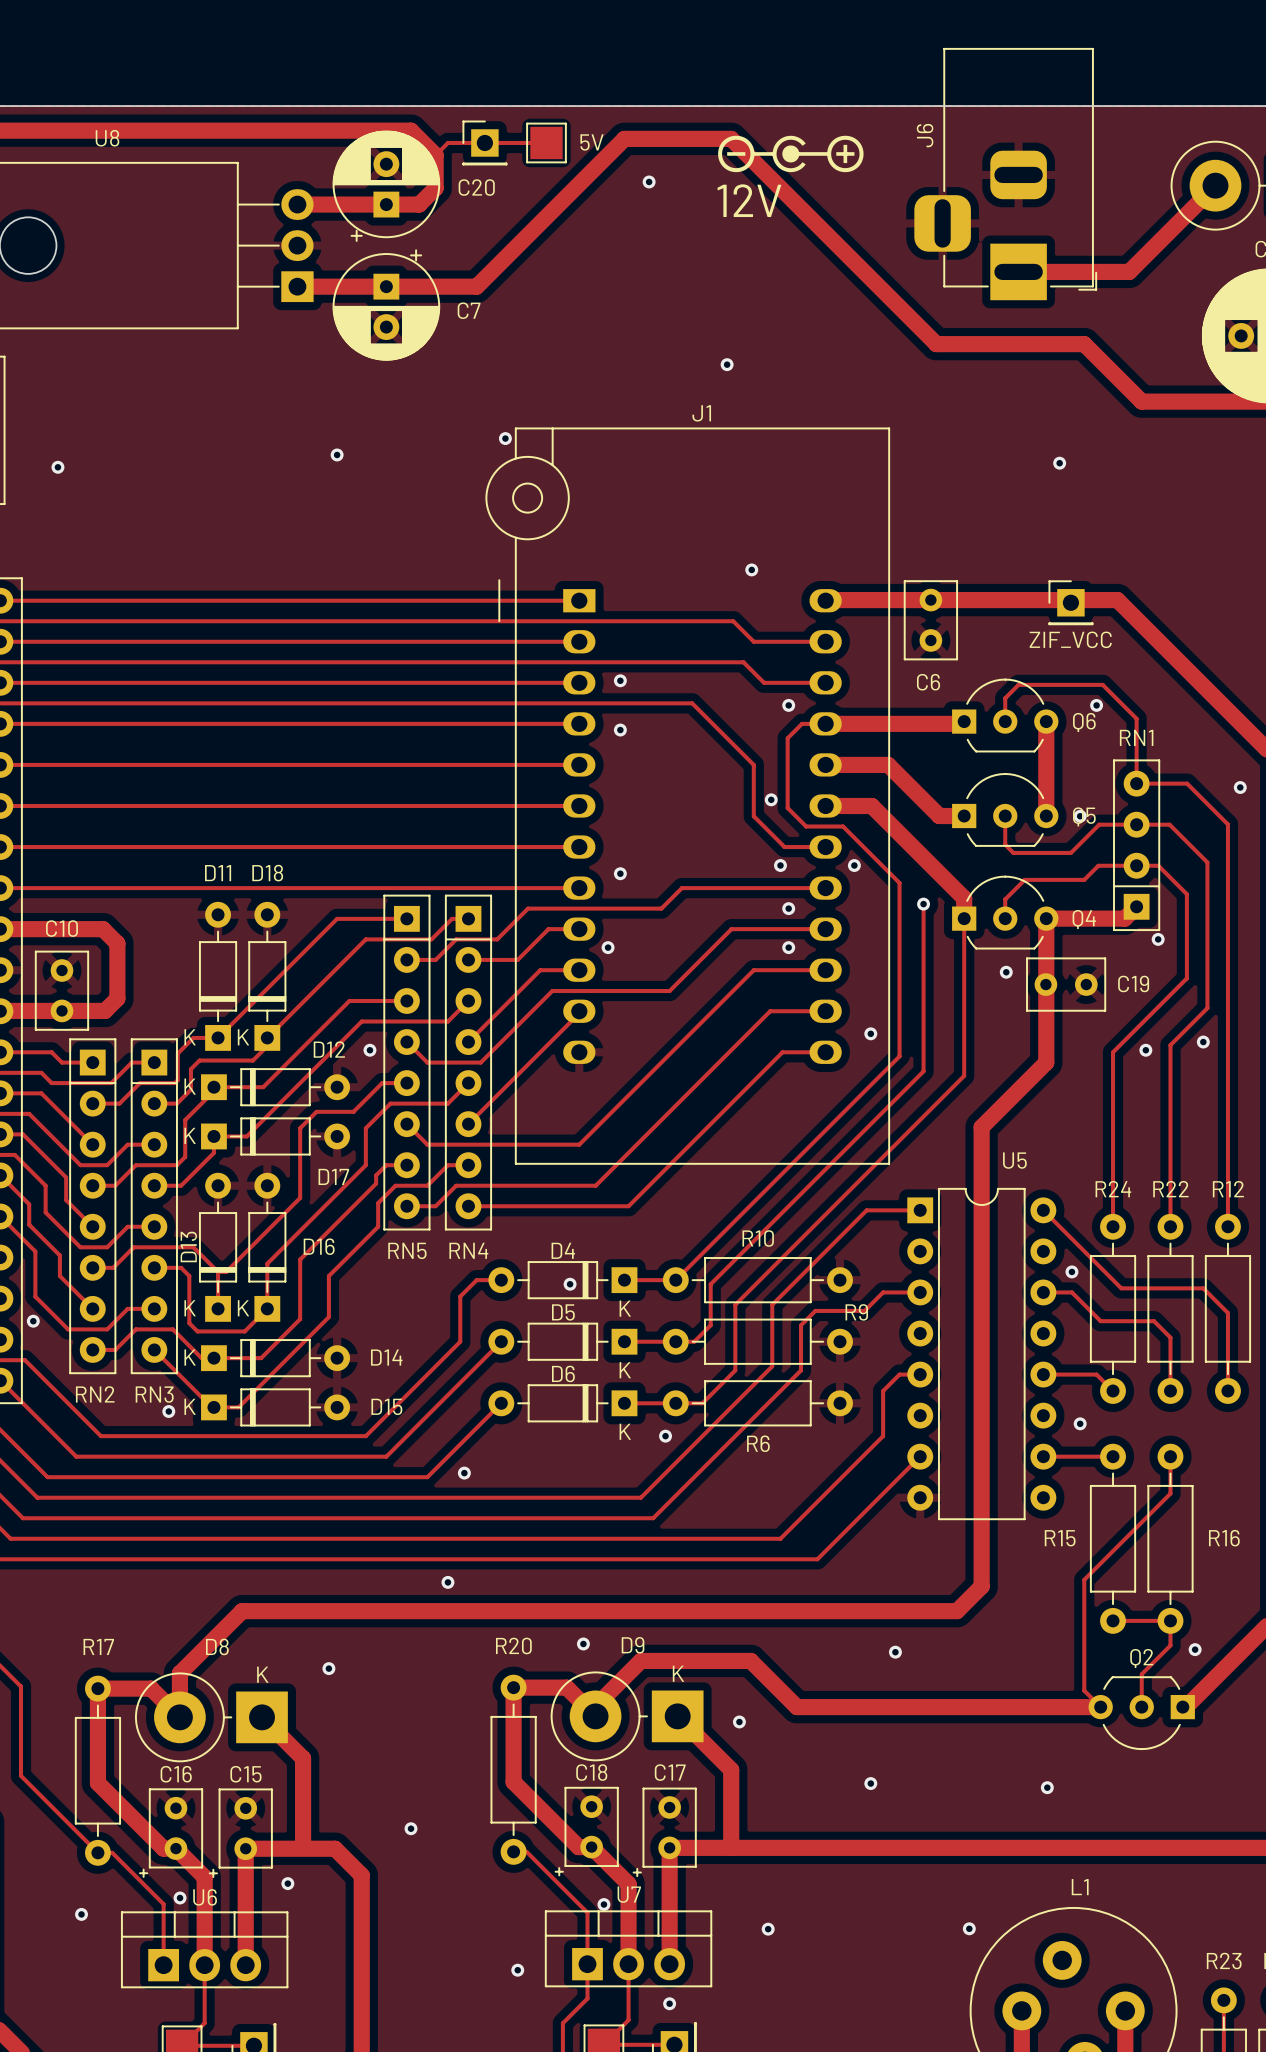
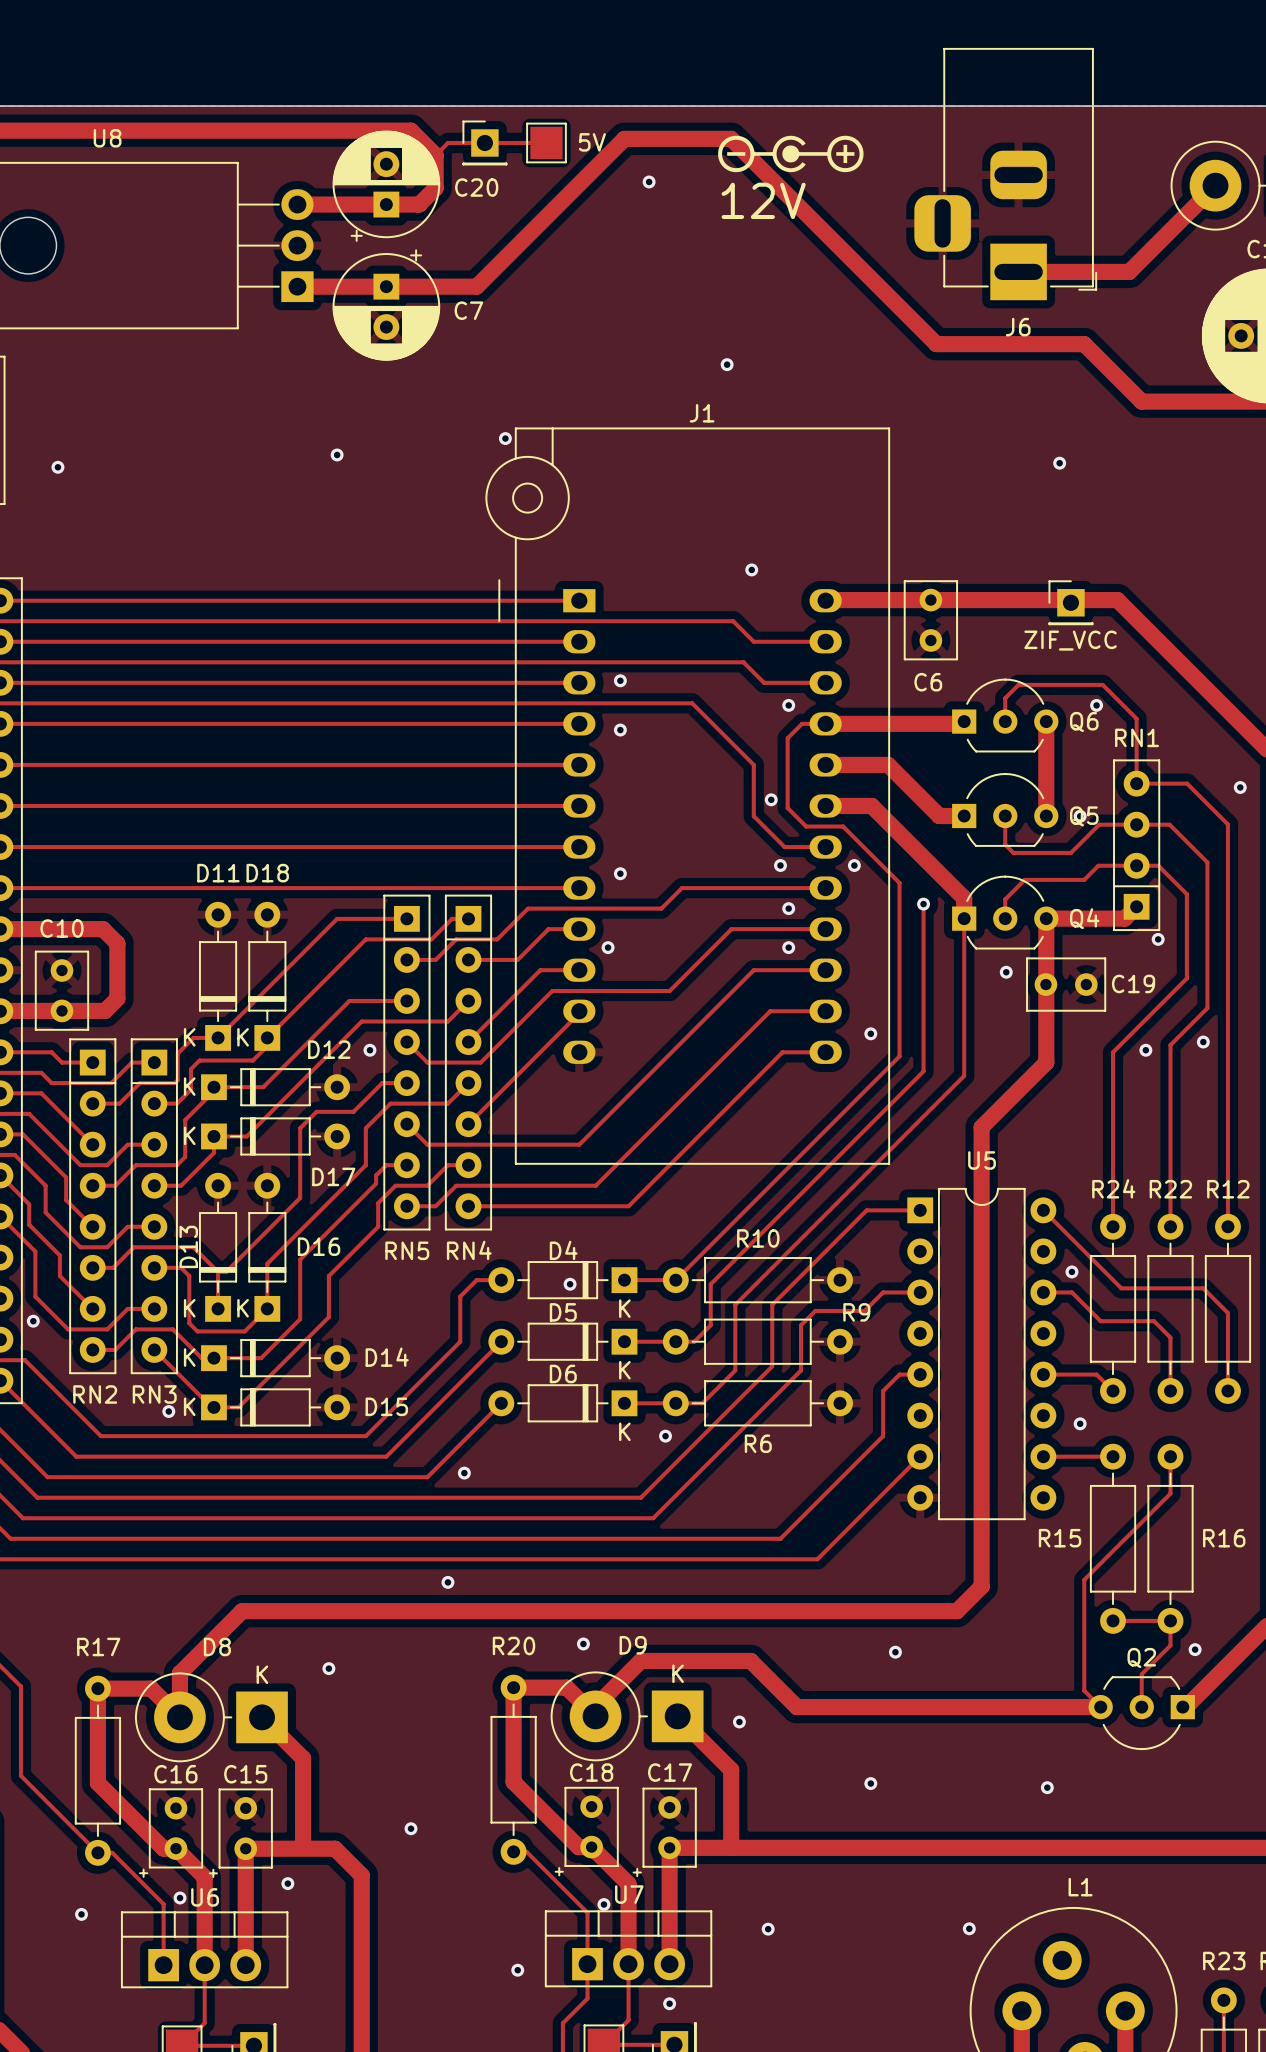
J6 name rotation: 0° (925, 135) -> 90° clockwise (1018, 327)
J6 name position: J6 (925, 135) -> J6 (1018, 327)
U5 name position: U5 (1014, 1160) -> U5 (982, 1160)

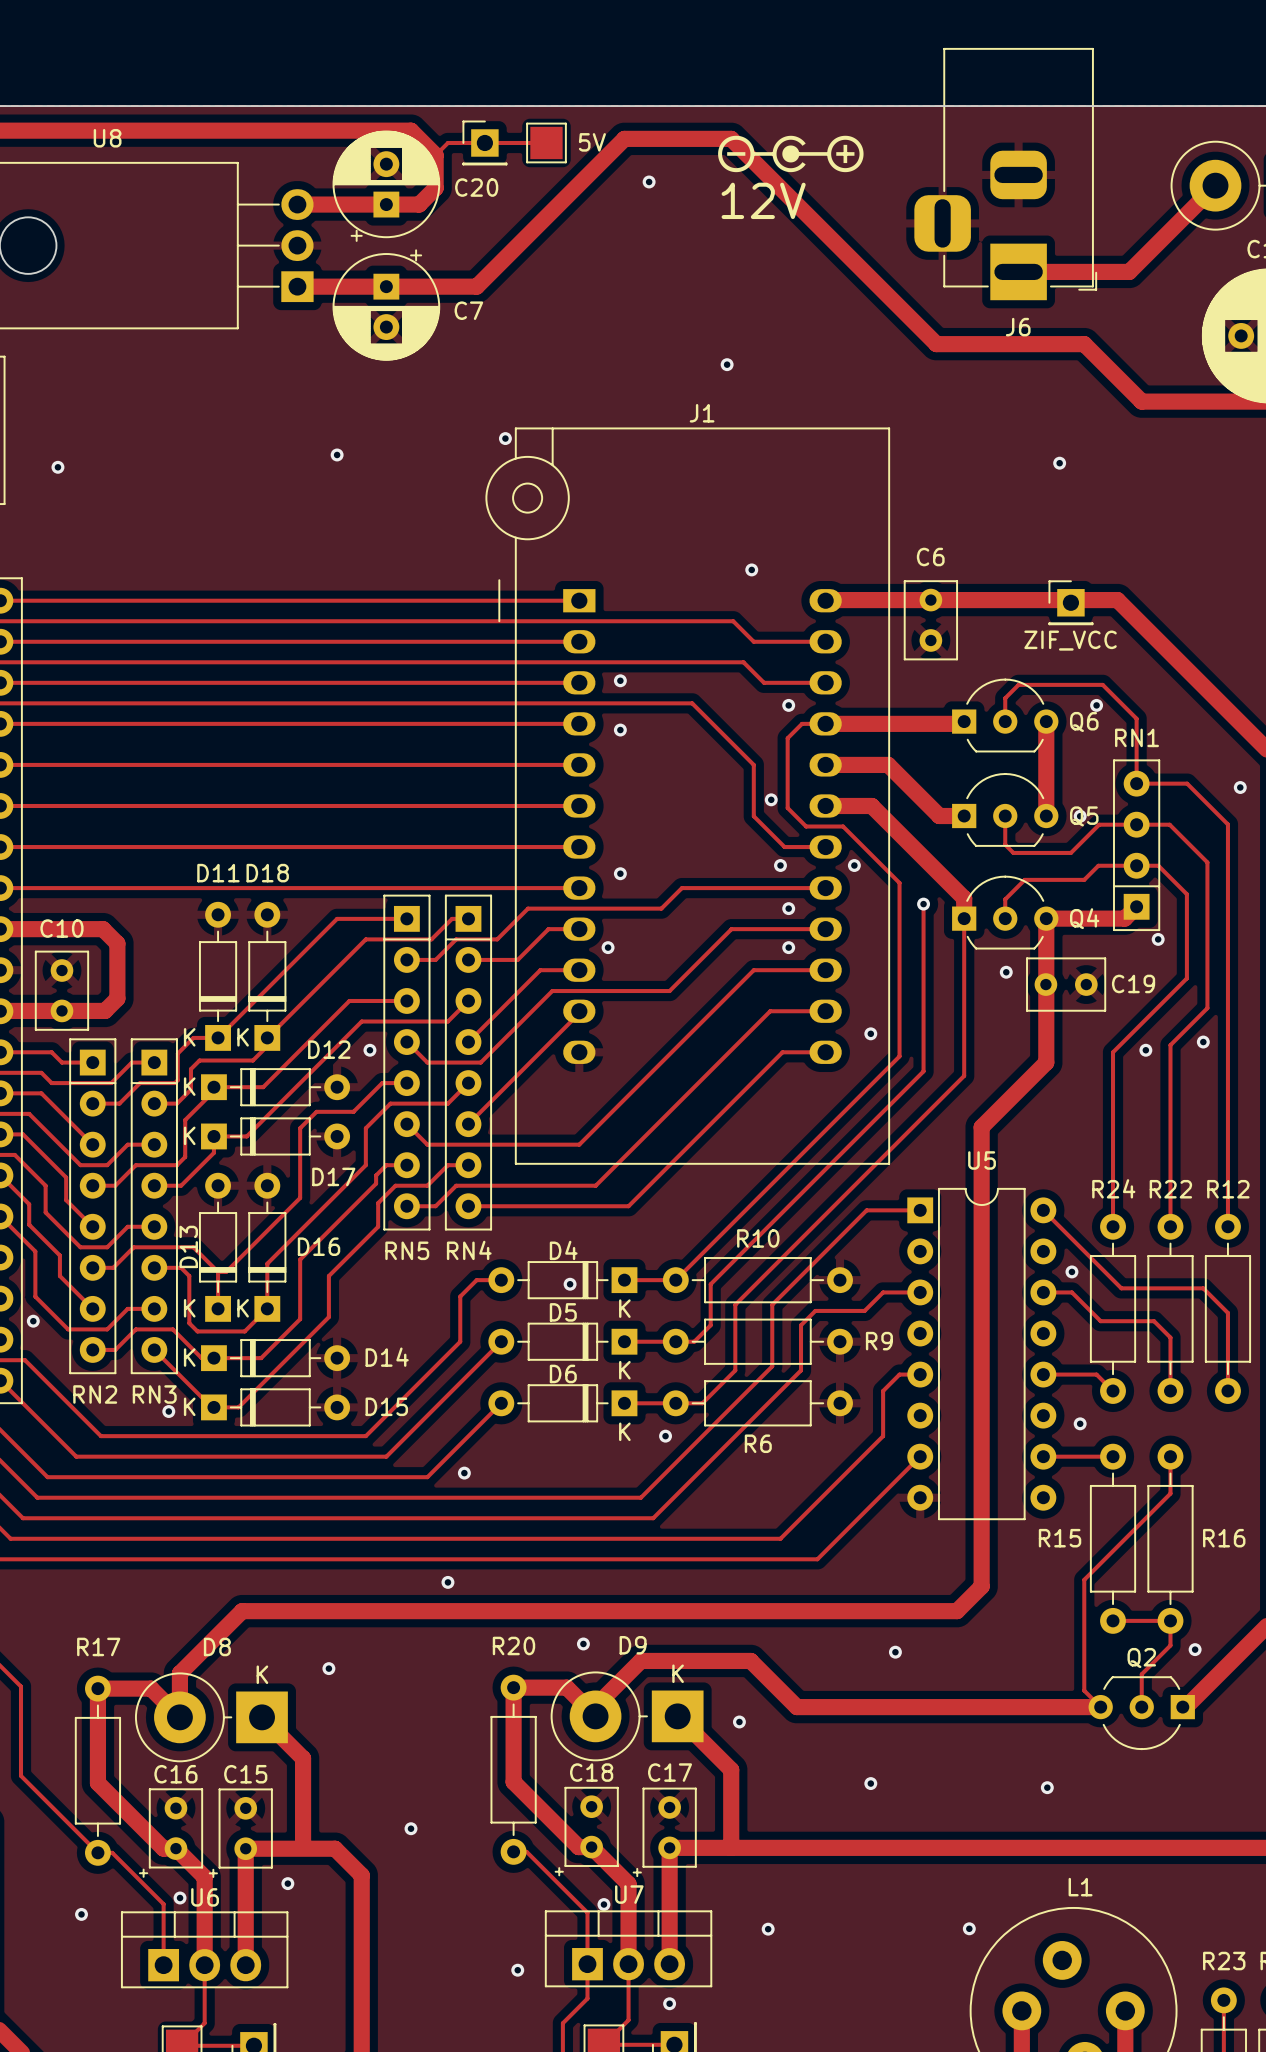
C6 name position: C6 (928, 682) -> C6 (930, 557)
R9 name position: R9 (856, 1312) -> R9 (879, 1341)

